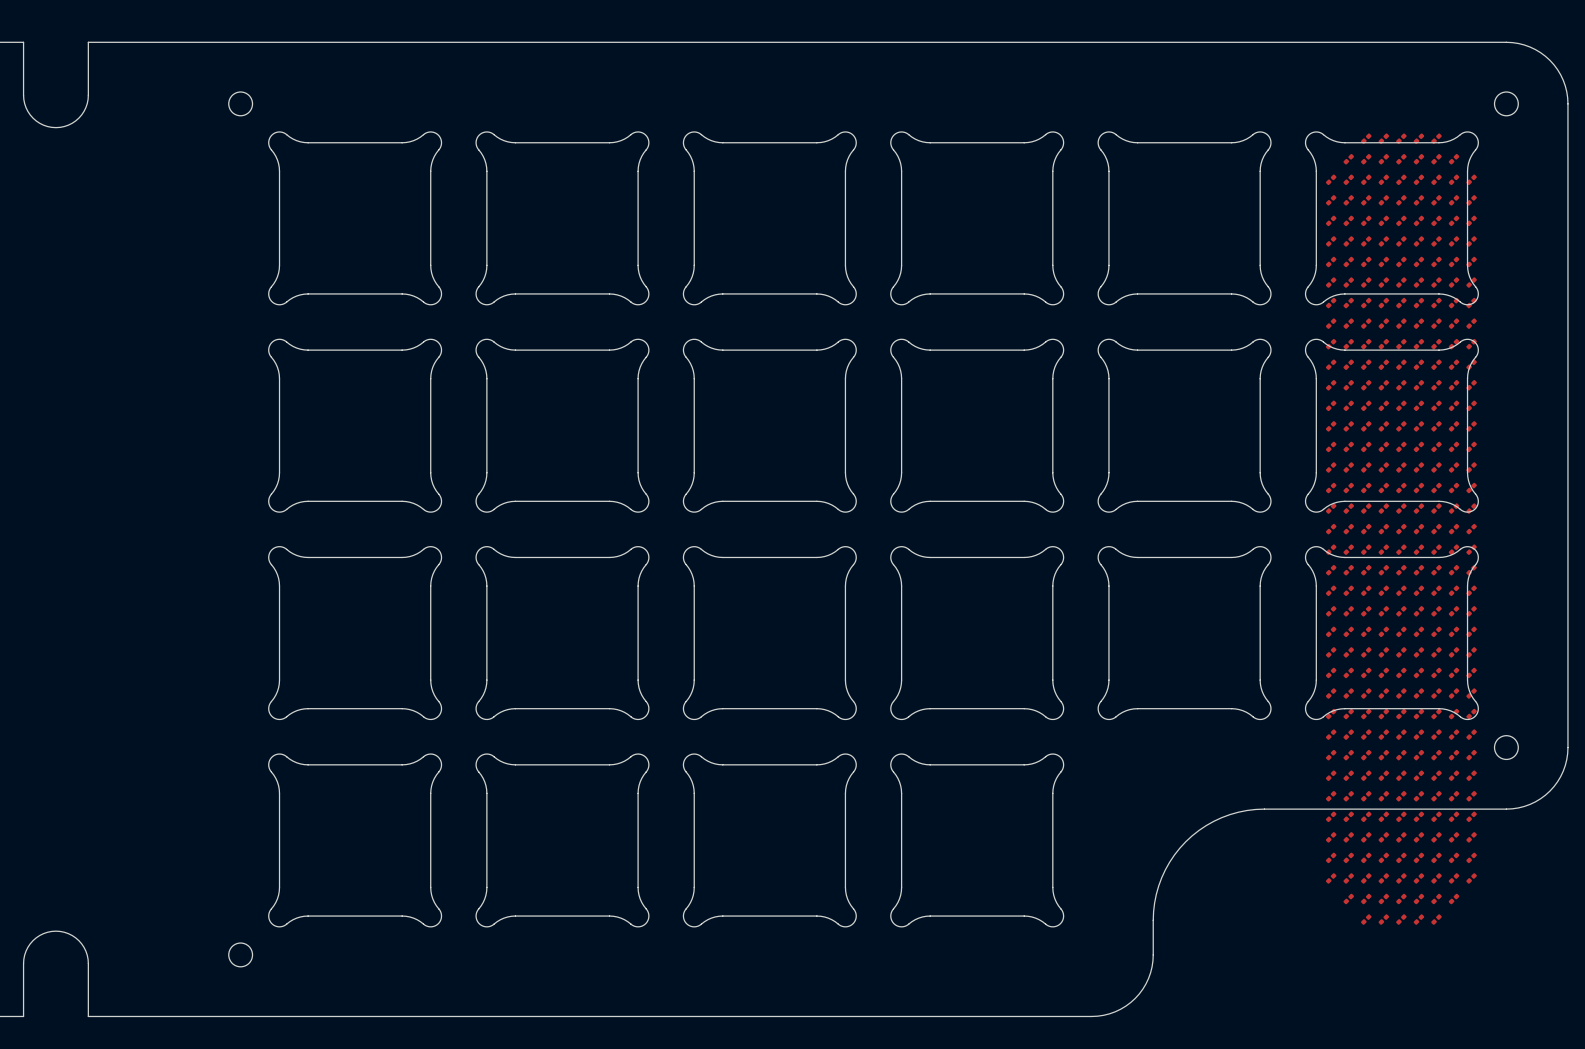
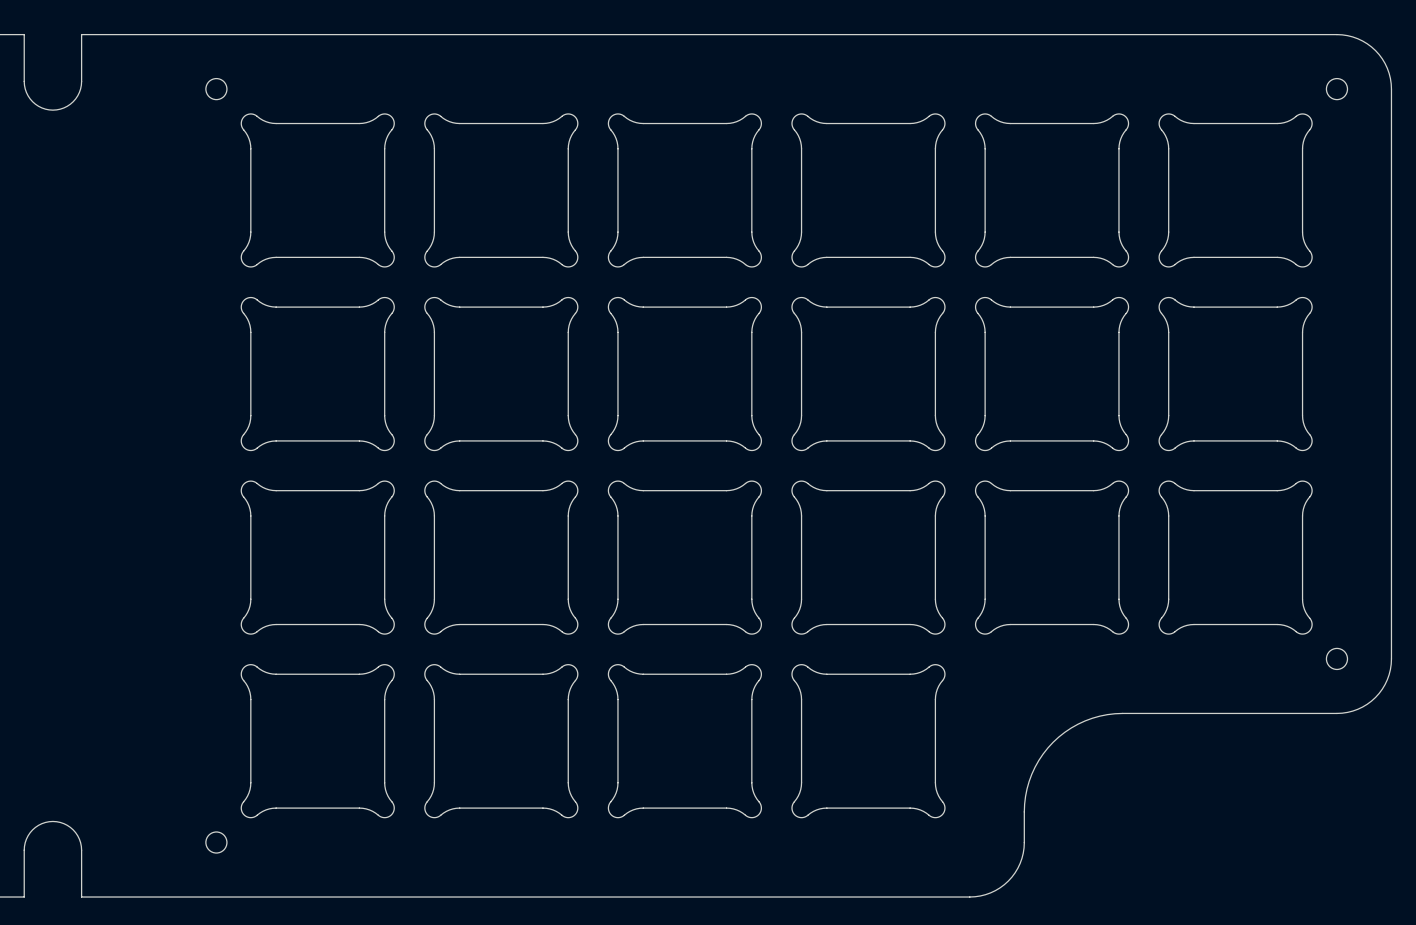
part: (1366, 138) -> none
part: (1383, 138) -> none
part: (1401, 138) -> none
part: (1418, 138) -> none
part: (1436, 138) -> none
part: (1348, 159) -> none
part: (1366, 159) -> none
part: (1383, 159) -> none
part: (1401, 159) -> none
part: (1418, 159) -> none
part: (1436, 159) -> none
part: (1454, 159) -> none
part: (1331, 179) -> none
part: (1348, 179) -> none
part: (1366, 179) -> none
part: (1383, 179) -> none
part: (1401, 179) -> none
part: (1418, 179) -> none
part: (1436, 179) -> none
part: (1454, 179) -> none
part: (1471, 179) -> none
part: (1331, 200) -> none
part: (1348, 200) -> none
part: (1366, 200) -> none
part: (1383, 200) -> none
part: (1401, 200) -> none
part: (1418, 200) -> none
part: (1436, 200) -> none
part: (1454, 200) -> none
part: (1471, 200) -> none
part: (1331, 220) -> none
part: (1348, 220) -> none
part: (1366, 220) -> none
part: (1383, 220) -> none
part: (1401, 220) -> none
part: (1418, 220) -> none
part: (1436, 220) -> none
part: (1454, 220) -> none
part: (1471, 220) -> none
part: (1331, 241) -> none
part: (1348, 241) -> none
part: (1366, 241) -> none
part: (1383, 241) -> none
part: (1401, 241) -> none
part: (1418, 241) -> none
part: (1436, 241) -> none
part: (1454, 241) -> none
part: (1471, 241) -> none
part: (1331, 261) -> none
part: (1348, 261) -> none
part: (1366, 261) -> none
part: (1383, 261) -> none
part: (1401, 261) -> none
part: (1418, 261) -> none
part: (1436, 261) -> none
part: (1454, 261) -> none
part: (1471, 261) -> none
part: (1331, 282) -> none
part: (1348, 282) -> none
part: (1366, 282) -> none
part: (1383, 282) -> none
part: (1401, 282) -> none
part: (1418, 282) -> none
part: (1436, 282) -> none
part: (1454, 282) -> none
part: (1471, 282) -> none
part: (1331, 303) -> none
part: (1348, 303) -> none
part: (1366, 303) -> none
part: (1383, 303) -> none
part: (1401, 303) -> none
part: (1418, 303) -> none
part: (1436, 303) -> none
part: (1454, 303) -> none
part: (1471, 303) -> none
part: (1331, 323) -> none
part: (1348, 323) -> none
part: (1366, 323) -> none
part: (1383, 323) -> none
part: (1401, 323) -> none
part: (1418, 323) -> none
part: (1436, 323) -> none
part: (1454, 323) -> none
part: (1471, 323) -> none
part: (1331, 344) -> none
part: (1348, 344) -> none
part: (1366, 344) -> none
part: (1383, 344) -> none
part: (1401, 344) -> none
part: (1418, 344) -> none
part: (1436, 344) -> none
part: (1454, 344) -> none
part: (1471, 344) -> none
part: (1331, 364) -> none
part: (1348, 364) -> none
part: (1366, 364) -> none
part: (1383, 364) -> none
part: (1401, 364) -> none
part: (1418, 364) -> none
part: (1436, 364) -> none
part: (1454, 364) -> none
part: (1471, 364) -> none
part: (1331, 385) -> none
part: (1348, 385) -> none
part: (1366, 385) -> none
part: (1383, 385) -> none
part: (1401, 385) -> none
part: (1418, 385) -> none
part: (1436, 385) -> none
part: (1454, 385) -> none
part: (1471, 385) -> none
part: (1331, 405) -> none
part: (1348, 405) -> none
part: (1366, 405) -> none
part: (1383, 405) -> none
part: (1401, 405) -> none
part: (1418, 405) -> none
part: (1436, 405) -> none
part: (1454, 405) -> none
part: (1471, 405) -> none
part: (1331, 426) -> none
part: (1348, 426) -> none
part: (1366, 426) -> none
part: (1383, 426) -> none
part: (1401, 426) -> none
part: (1418, 426) -> none
part: (1436, 426) -> none
part: (1454, 426) -> none
part: (1471, 426) -> none
part: (1331, 446) -> none
part: (1348, 446) -> none
part: (1366, 446) -> none
part: (1383, 446) -> none
part: (1401, 446) -> none
part: (1418, 446) -> none
part: (1436, 446) -> none
part: (1454, 446) -> none
part: (1471, 446) -> none
part: (1331, 467) -> none
part: (1348, 467) -> none
part: (1366, 467) -> none
part: (1383, 467) -> none
part: (1401, 467) -> none
part: (1418, 467) -> none
part: (1436, 467) -> none
part: (1454, 467) -> none
part: (1471, 467) -> none
part: (1331, 488) -> none
part: (1348, 488) -> none
part: (1366, 488) -> none
part: (1383, 488) -> none
part: (1401, 488) -> none
part: (1418, 488) -> none
part: (1436, 488) -> none
part: (1454, 488) -> none
part: (1471, 488) -> none
part: (1331, 508) -> none
part: (1348, 508) -> none
part: (1366, 508) -> none
part: (1383, 508) -> none
part: (1401, 508) -> none
part: (1418, 508) -> none
part: (1436, 508) -> none
part: (1454, 508) -> none
part: (1471, 508) -> none
part: (1331, 529) -> none
part: (1348, 529) -> none
part: (1366, 529) -> none
part: (1383, 529) -> none
part: (1401, 529) -> none
part: (1418, 529) -> none
part: (1436, 529) -> none
part: (1454, 529) -> none
part: (1471, 529) -> none
part: (1331, 549) -> none
part: (1348, 549) -> none
part: (1366, 549) -> none
part: (1383, 549) -> none
part: (1401, 549) -> none
part: (1418, 549) -> none
part: (1436, 549) -> none
part: (1454, 549) -> none
part: (1471, 549) -> none
part: (1331, 570) -> none
part: (1348, 570) -> none
part: (1366, 570) -> none
part: (1383, 570) -> none
part: (1401, 570) -> none
part: (1418, 570) -> none
part: (1436, 570) -> none
part: (1454, 570) -> none
part: (1471, 570) -> none
part: (1331, 590) -> none
part: (1348, 590) -> none
part: (1366, 590) -> none
part: (1383, 590) -> none
part: (1401, 590) -> none
part: (1418, 590) -> none
part: (1436, 590) -> none
part: (1454, 590) -> none
part: (1471, 590) -> none
part: (1331, 611) -> none
part: (1348, 611) -> none
part: (1366, 611) -> none
part: (1383, 611) -> none
part: (1401, 611) -> none
part: (1418, 611) -> none
part: (1436, 611) -> none
part: (1454, 611) -> none
part: (1471, 611) -> none
part: (1331, 631) -> none
part: (1348, 631) -> none
part: (1366, 631) -> none
part: (1383, 631) -> none
part: (1401, 631) -> none
part: (1418, 631) -> none
part: (1436, 631) -> none
part: (1454, 631) -> none
part: (1471, 631) -> none
part: (1331, 652) -> none
part: (1348, 652) -> none
part: (1366, 652) -> none
part: (1383, 652) -> none
part: (1401, 652) -> none
part: (1418, 652) -> none
part: (1436, 652) -> none
part: (1454, 652) -> none
part: (1471, 652) -> none
part: (1331, 672) -> none
part: (1348, 672) -> none
part: (1366, 672) -> none
part: (1383, 672) -> none
part: (1401, 672) -> none
part: (1418, 672) -> none
part: (1436, 672) -> none
part: (1454, 672) -> none
part: (1471, 672) -> none
part: (1331, 693) -> none
part: (1348, 693) -> none
part: (1366, 693) -> none
part: (1383, 693) -> none
part: (1401, 693) -> none
part: (1418, 693) -> none
part: (1436, 693) -> none
part: (1454, 693) -> none
part: (1471, 693) -> none
part: (1331, 714) -> none
part: (1348, 714) -> none
part: (1366, 714) -> none
part: (1383, 714) -> none
part: (1401, 714) -> none
part: (1418, 714) -> none
part: (1436, 714) -> none
part: (1454, 714) -> none
part: (1471, 714) -> none
part: (1331, 734) -> none
part: (1348, 734) -> none
part: (1366, 734) -> none
part: (1383, 734) -> none
part: (1401, 734) -> none
part: (1418, 734) -> none
part: (1436, 734) -> none
part: (1454, 734) -> none
part: (1471, 734) -> none
part: (1331, 755) -> none
part: (1348, 755) -> none
part: (1366, 755) -> none
part: (1383, 755) -> none
part: (1401, 755) -> none
part: (1418, 755) -> none
part: (1436, 755) -> none
part: (1454, 755) -> none
part: (1471, 755) -> none
part: (1331, 775) -> none
part: (1348, 775) -> none
part: (1366, 775) -> none
part: (1383, 775) -> none
part: (1401, 775) -> none
part: (1418, 775) -> none
part: (1436, 775) -> none
part: (1454, 775) -> none
part: (1471, 775) -> none
part: (1331, 796) -> none
part: (1348, 796) -> none
part: (1366, 796) -> none
part: (1383, 796) -> none
part: (1401, 796) -> none
part: (1418, 796) -> none
part: (1436, 796) -> none
part: (1454, 796) -> none
part: (1471, 796) -> none
part: (1331, 816) -> none
part: (1348, 816) -> none
part: (1366, 816) -> none
part: (1383, 816) -> none
part: (1401, 816) -> none
part: (1418, 816) -> none
part: (1436, 816) -> none
part: (1454, 816) -> none
part: (1471, 816) -> none
part: (1331, 837) -> none
part: (1348, 837) -> none
part: (1366, 837) -> none
part: (1383, 837) -> none
part: (1401, 837) -> none
part: (1418, 837) -> none
part: (1436, 837) -> none
part: (1454, 837) -> none
part: (1471, 837) -> none
part: (1331, 857) -> none
part: (1348, 857) -> none
part: (1366, 857) -> none
part: (1383, 857) -> none
part: (1401, 857) -> none
part: (1418, 857) -> none
part: (1436, 857) -> none
part: (1454, 857) -> none
part: (1471, 857) -> none
part: (1331, 878) -> none
part: (1348, 878) -> none
part: (1366, 878) -> none
part: (1383, 878) -> none
part: (1401, 878) -> none
part: (1418, 878) -> none
part: (1436, 878) -> none
part: (1454, 878) -> none
part: (1471, 878) -> none
part: (1348, 899) -> none
part: (1366, 899) -> none
part: (1383, 899) -> none
part: (1401, 899) -> none
part: (1418, 899) -> none
part: (1436, 899) -> none
part: (1454, 899) -> none
part: (1366, 919) -> none
part: (1383, 919) -> none
part: (1401, 919) -> none
part: (1418, 919) -> none
part: (1436, 919) -> none

